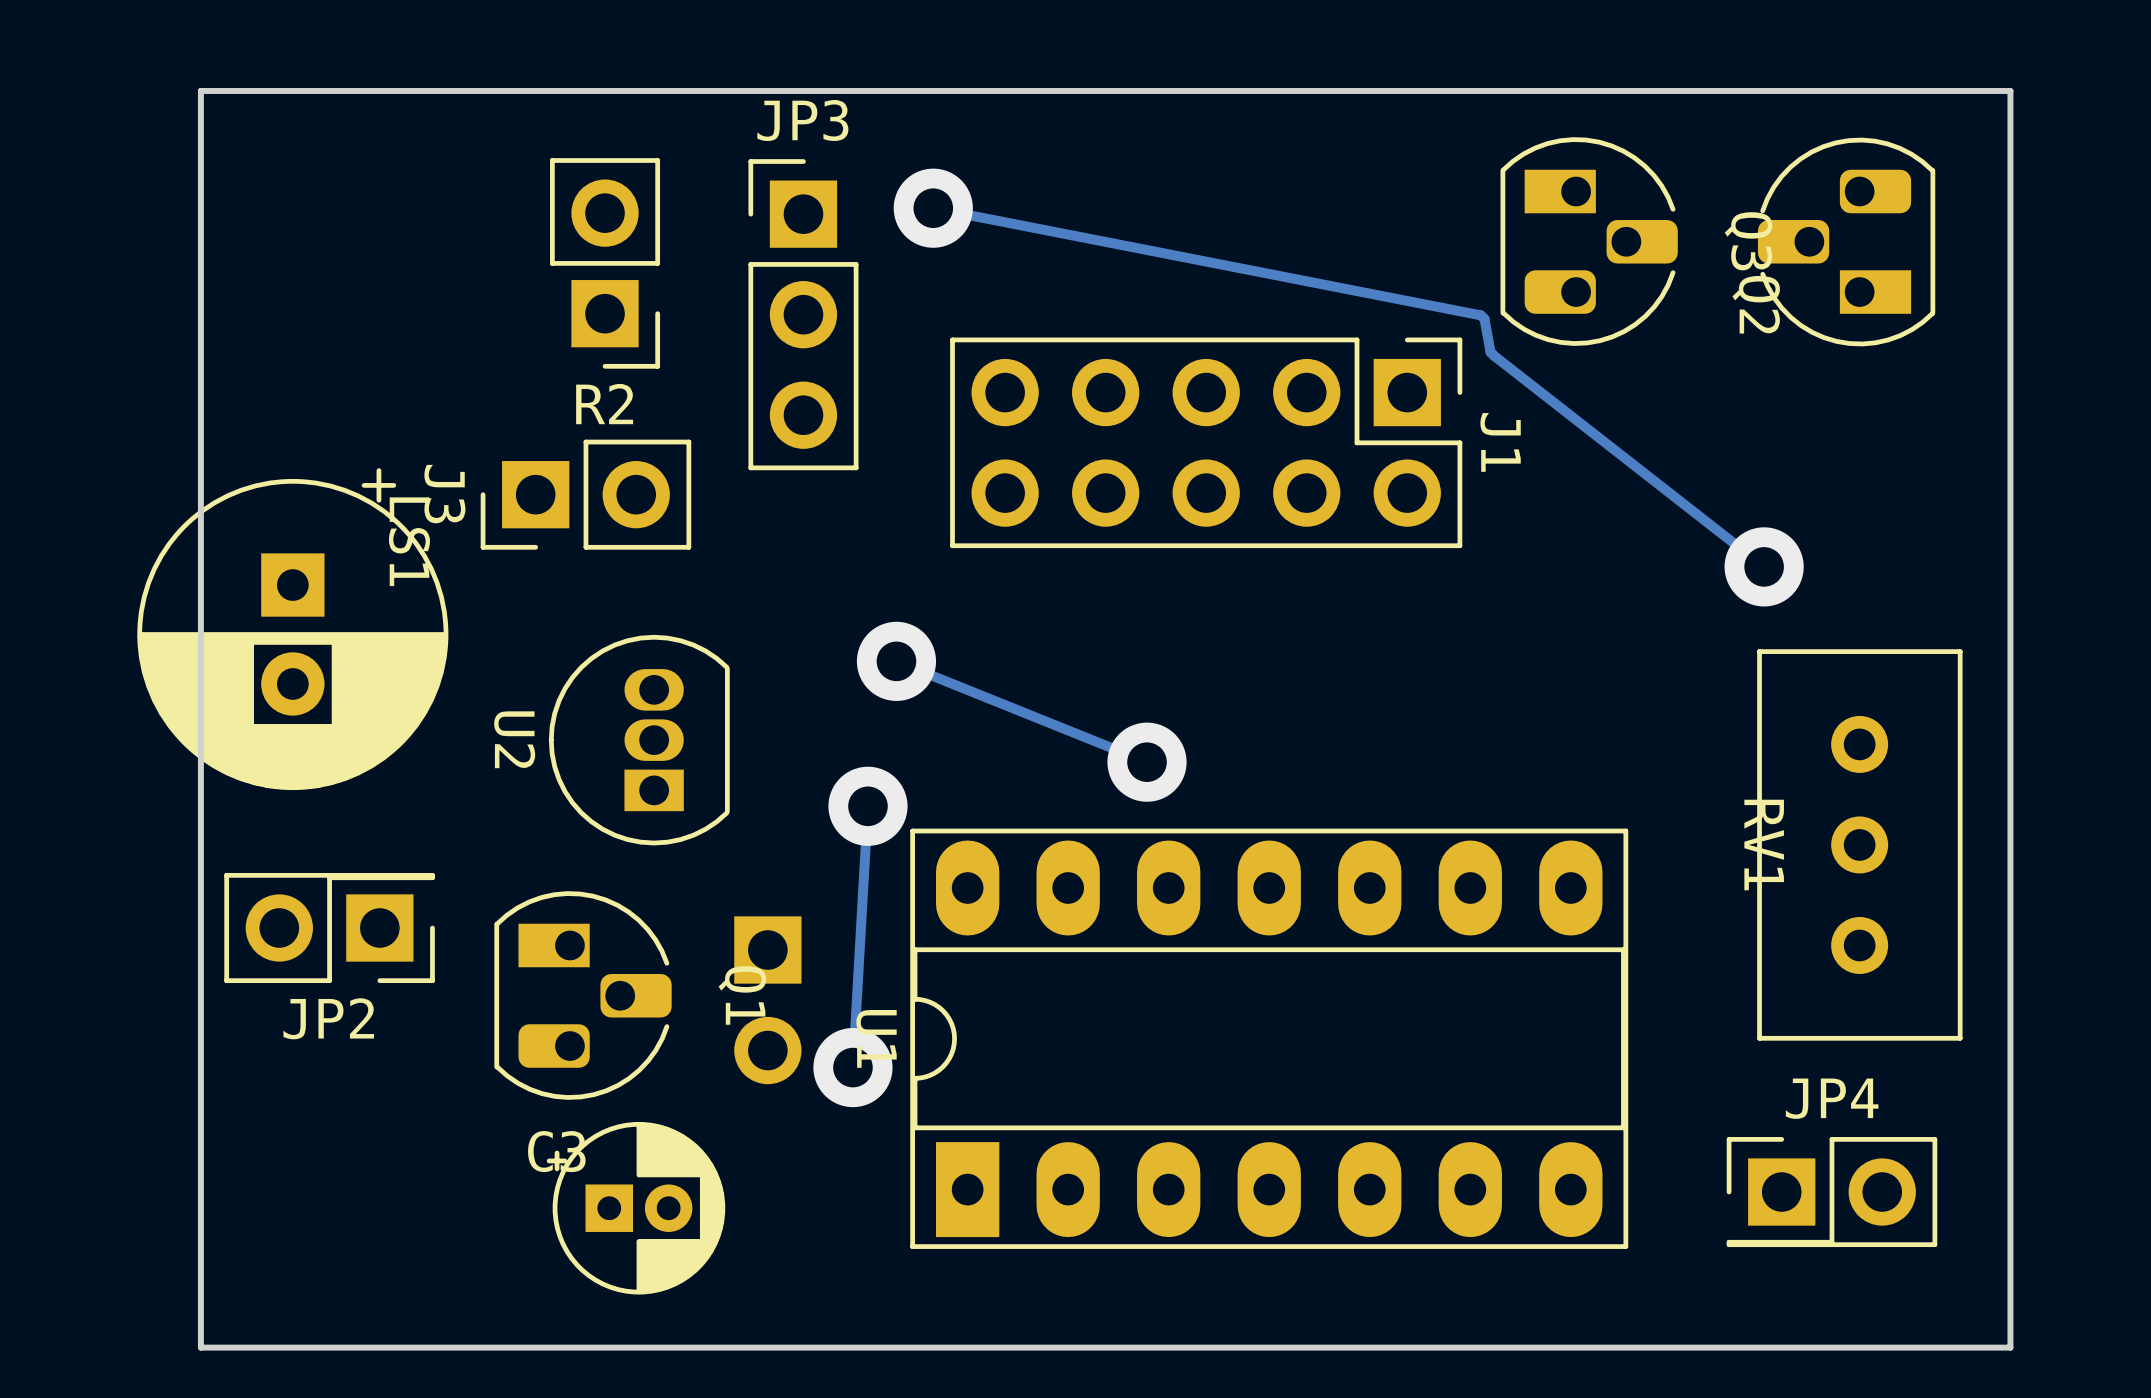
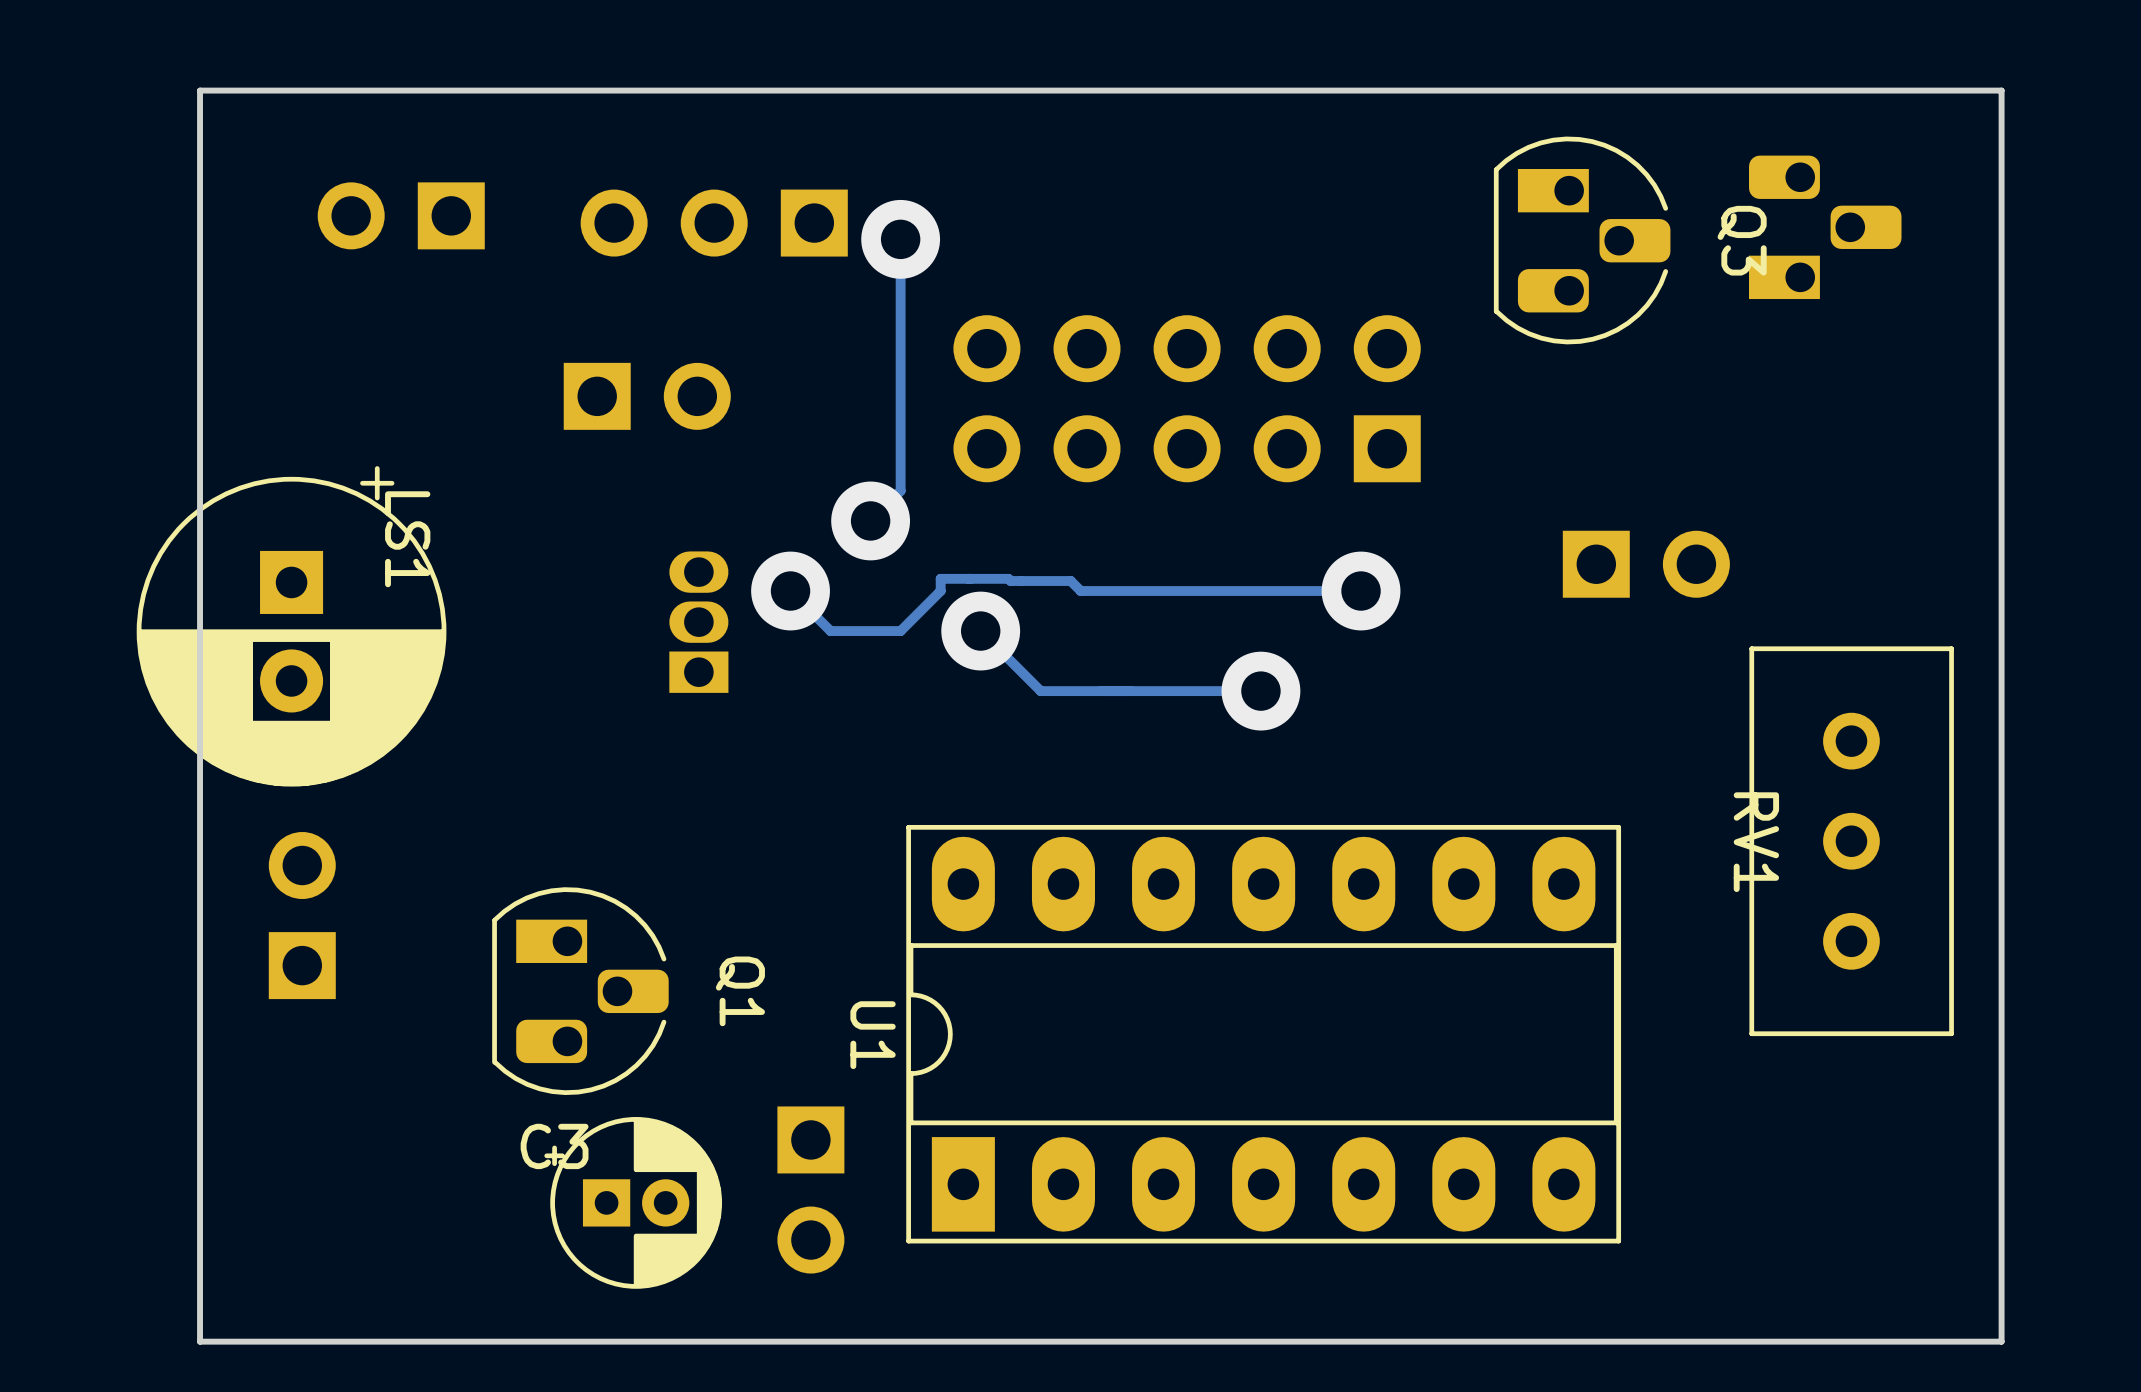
track: (933, 208) (1480, 315) (1484, 318) (1490, 352) (1494, 355) (1764, 566) -> none
via position: (933, 208) -> (900, 239)
track: none -> (900, 239) (900, 490) (870, 520)
Q2 side: bottom (1846, 242) -> top (1825, 227)
R2 side: bottom (605, 263) -> top (401, 215)
JP3 side: bottom (803, 314) -> top (714, 223)
J1 side: bottom (1206, 442) -> top (1187, 398)
J3 side: bottom (585, 494) -> top (647, 396)
via: none -> (870, 520)
via: (1764, 566) -> none
via: none -> (790, 591)
track: none -> (1361, 591) (1080, 591) (1070, 581) (940, 578) (940, 591) (900, 631) (830, 631) (790, 591)
via: none -> (1361, 591)
track: none -> (980, 631) (1040, 691) (1260, 691)
via: none -> (980, 631)
track: (896, 661) (1147, 762) -> none
via: (896, 661) -> none
via: none -> (1260, 691)
U2 side: bottom (639, 740) -> top (698, 622)
via: (1147, 762) -> none
track: (867, 806) (852, 1067) -> none
via: (867, 806) -> none
JP2 side: bottom (329, 928) -> top (302, 915)
part position: (767, 1000) -> (810, 1189)
via: (852, 1067) -> none
JP4 side: bottom (1831, 1192) -> top (1646, 564)

